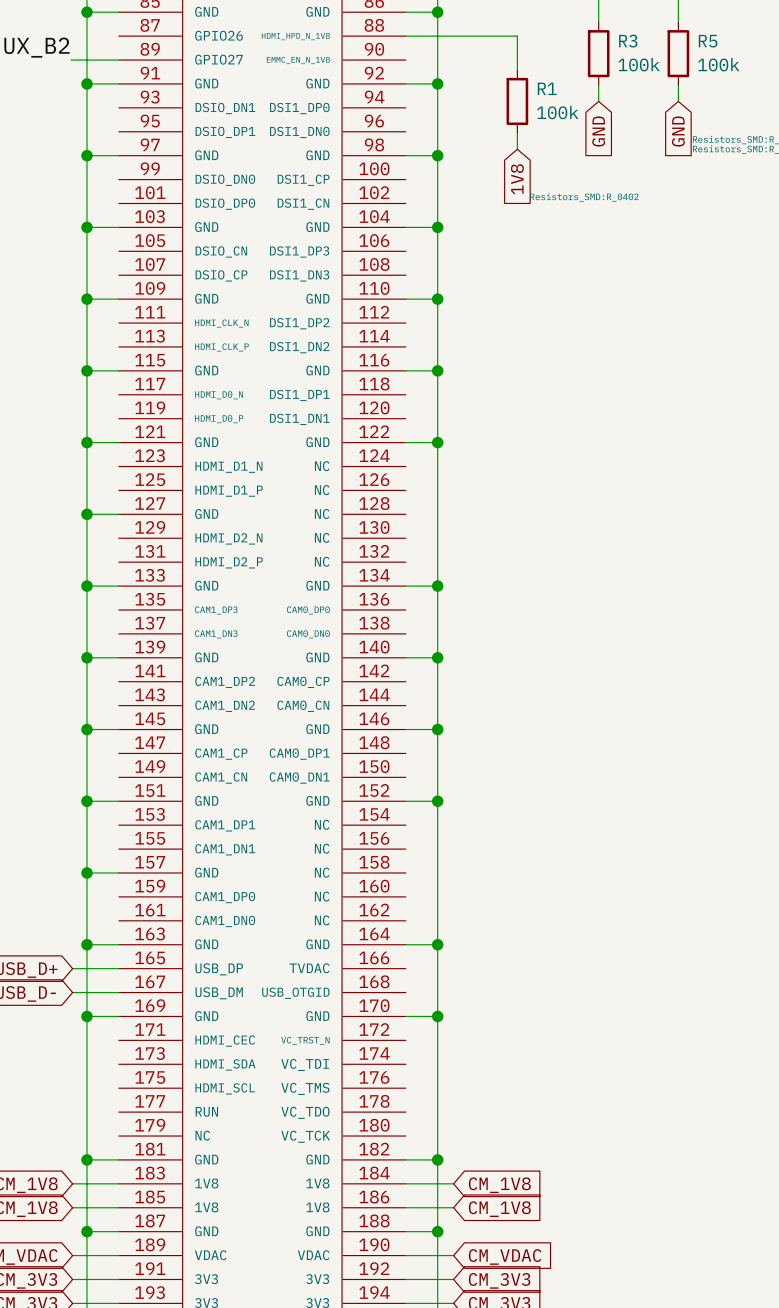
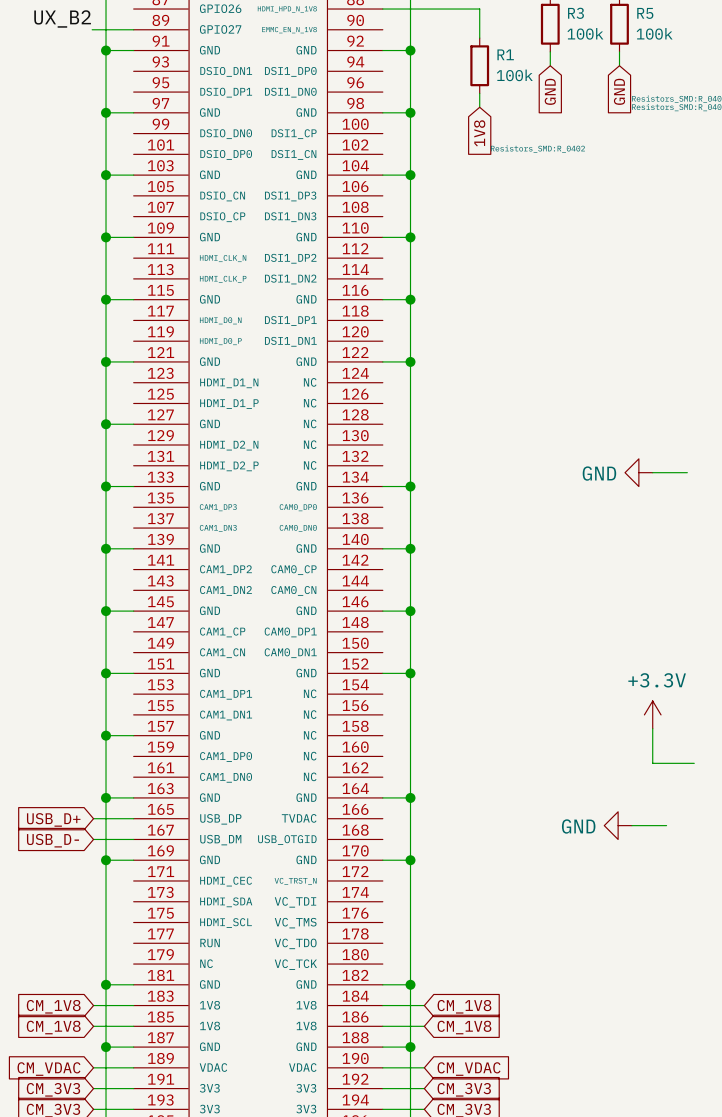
power symbol: none -> GND (638, 472)
wire: none -> (652, 472) (687, 472)
power symbol: none -> +3.3V (652, 714)
wire: none -> (652, 728) (652, 763) (694, 763)
power symbol: none -> GND (618, 825)
wire: none -> (631, 825) (666, 825)

